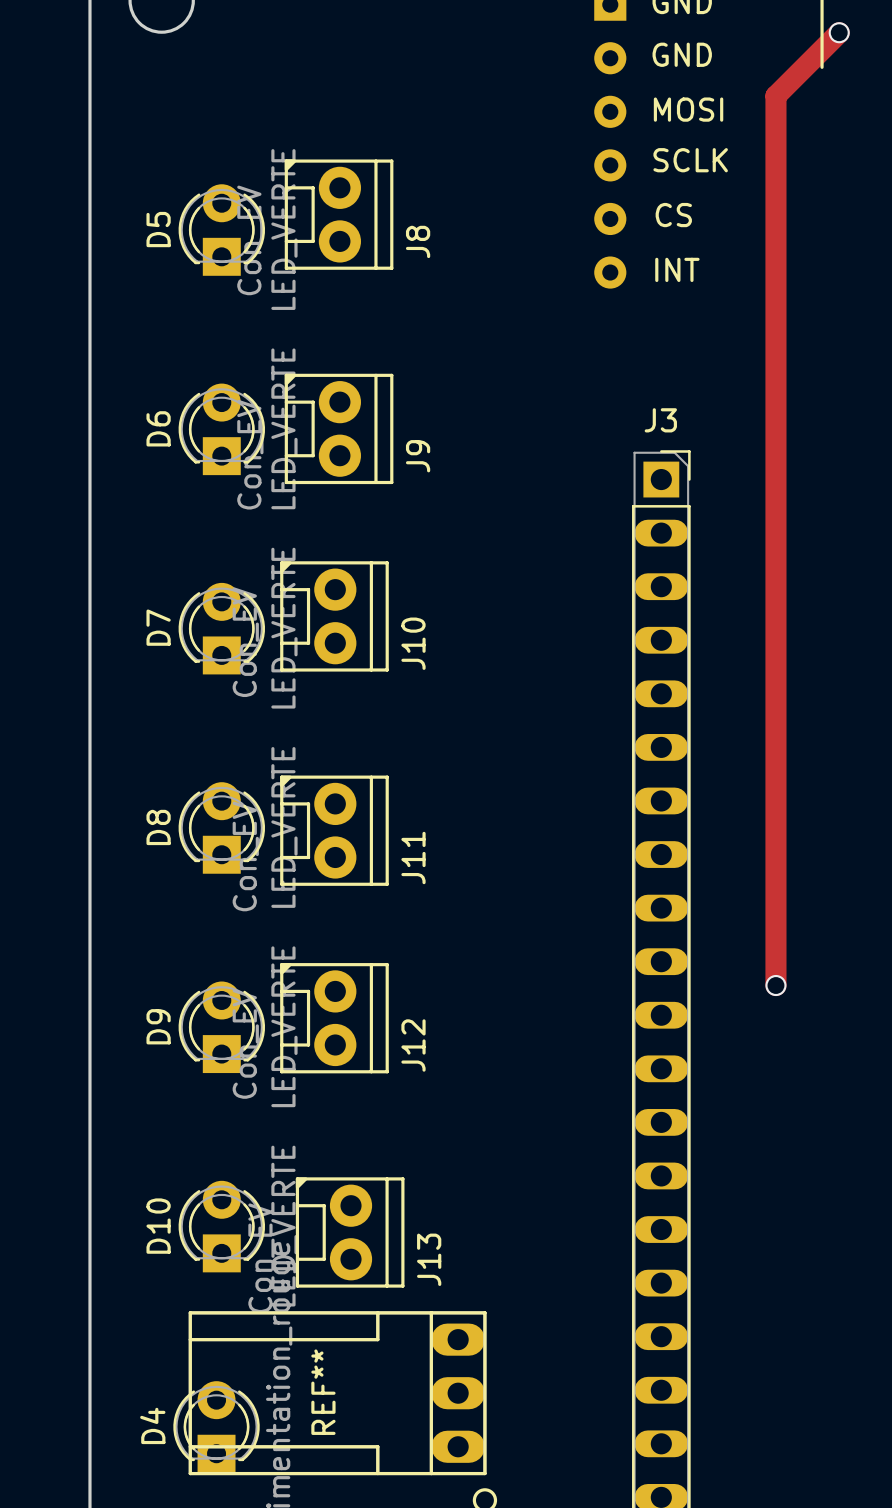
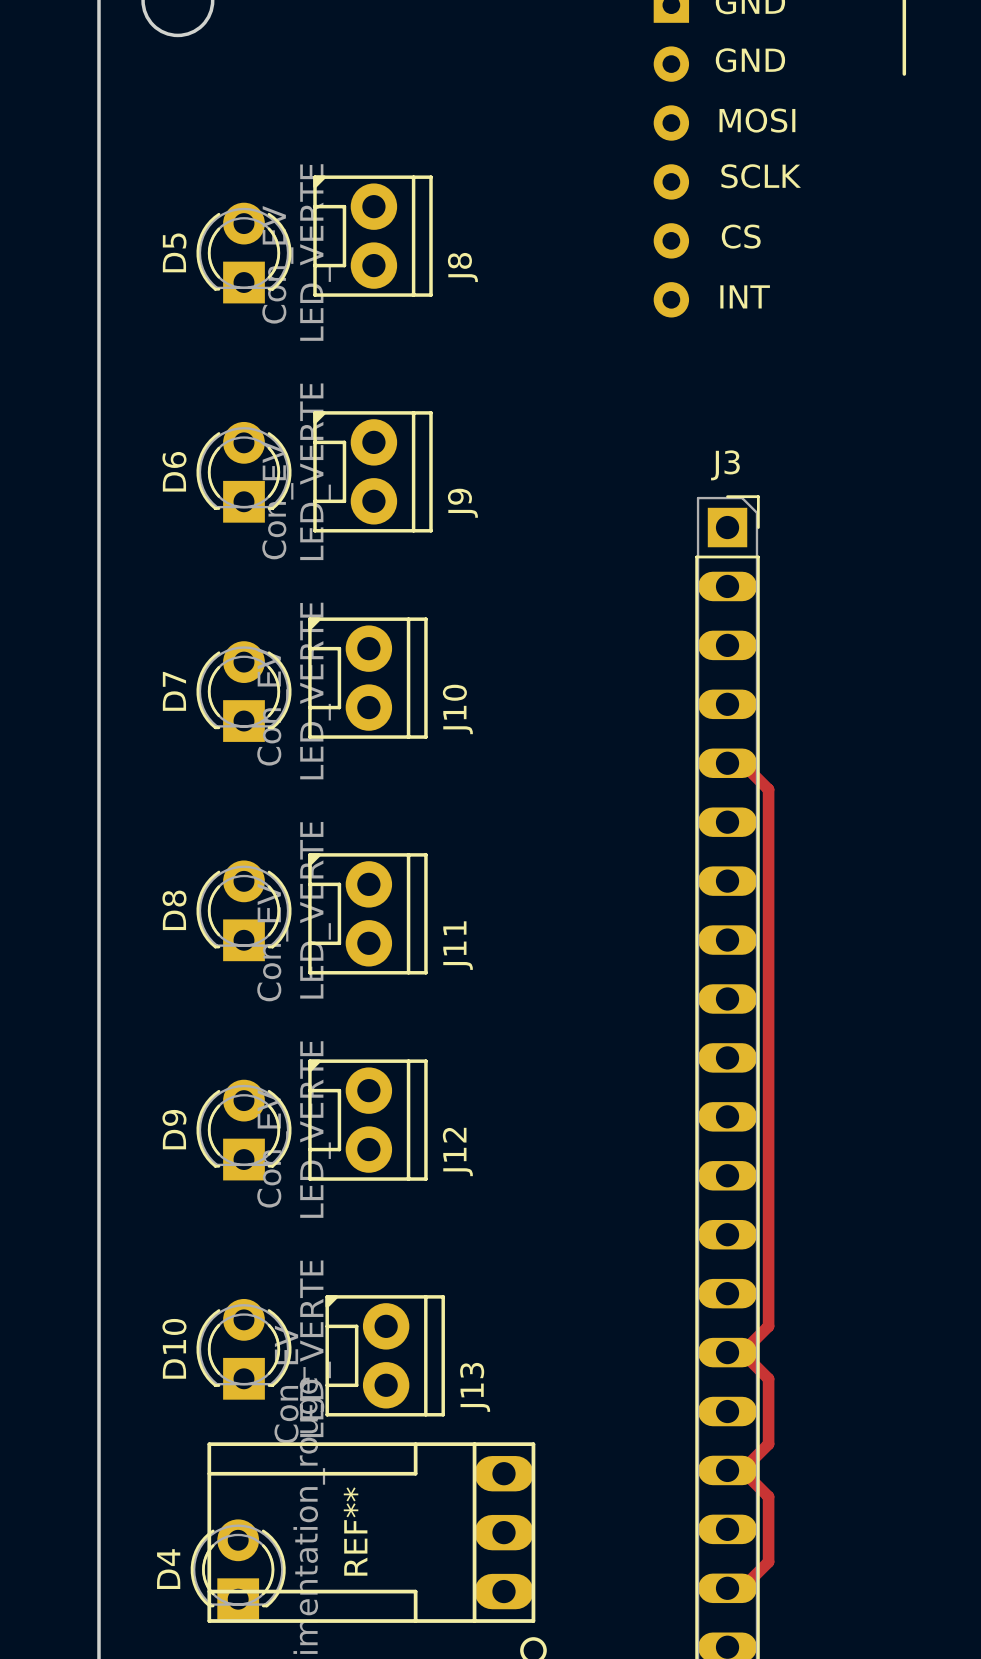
track: (839, 32) (775, 96) (775, 985) -> none
via: (839, 32) -> none
track: none -> (742, 763) (768, 789) (768, 1326) (742, 1352) (768, 1378) (768, 1444) (742, 1470) (768, 1496) (768, 1561) (742, 1588)
via: (775, 985) -> none

